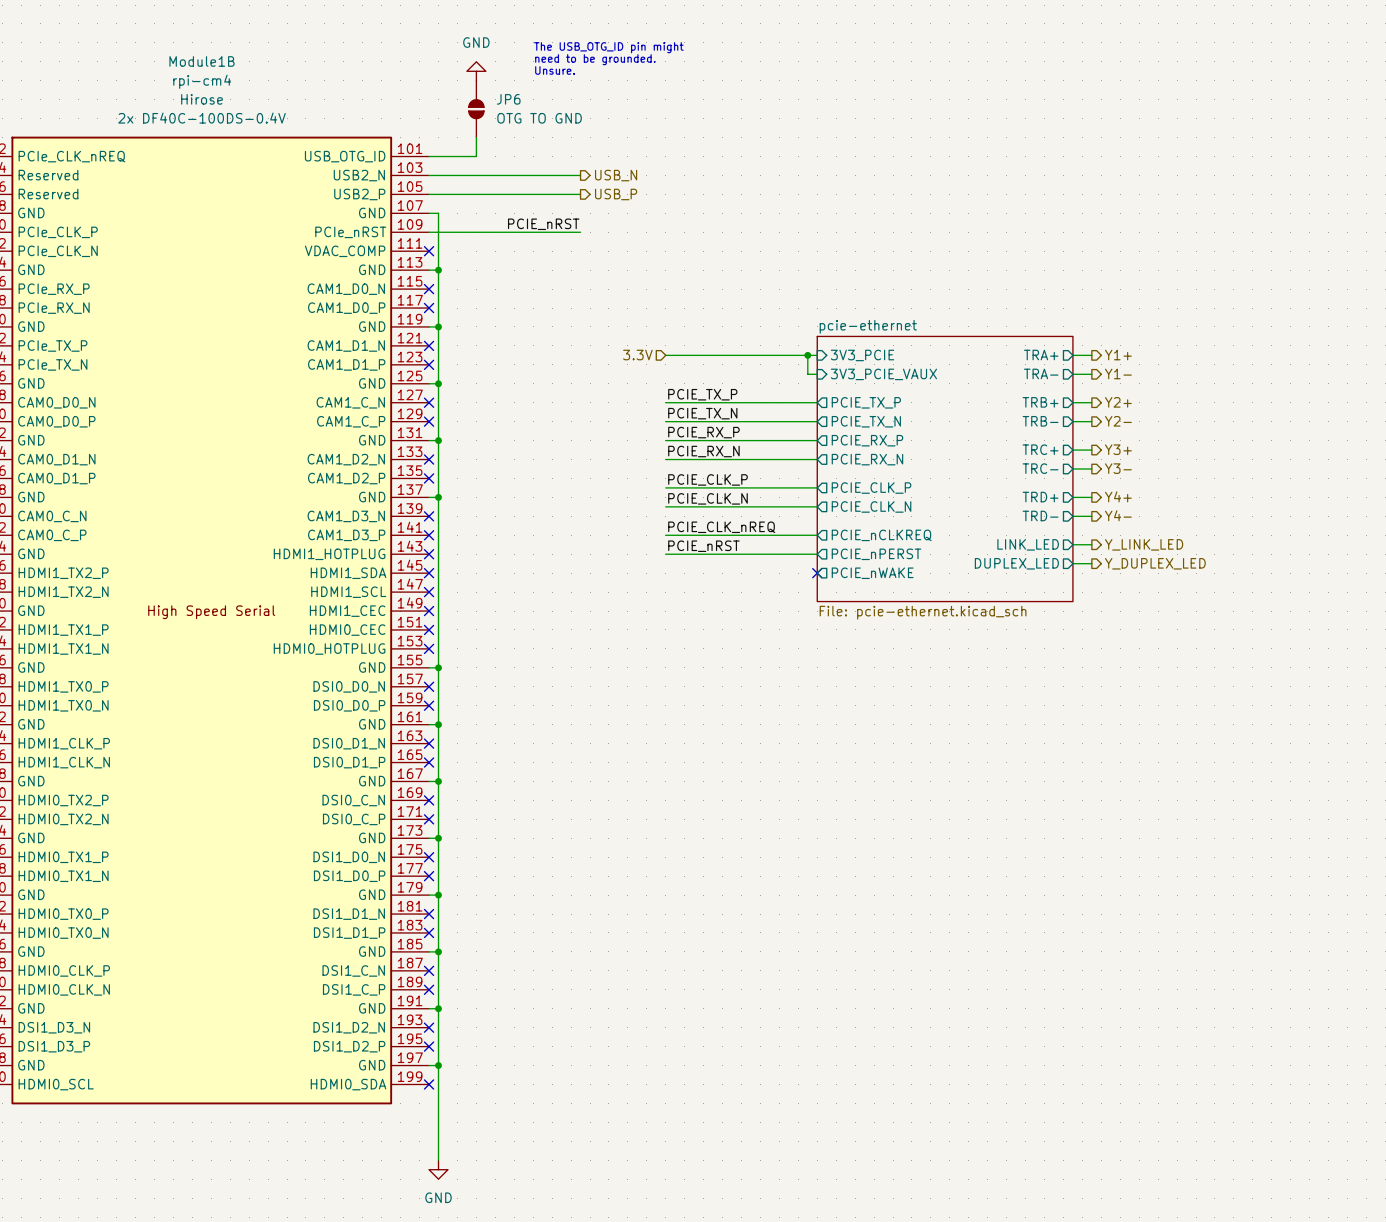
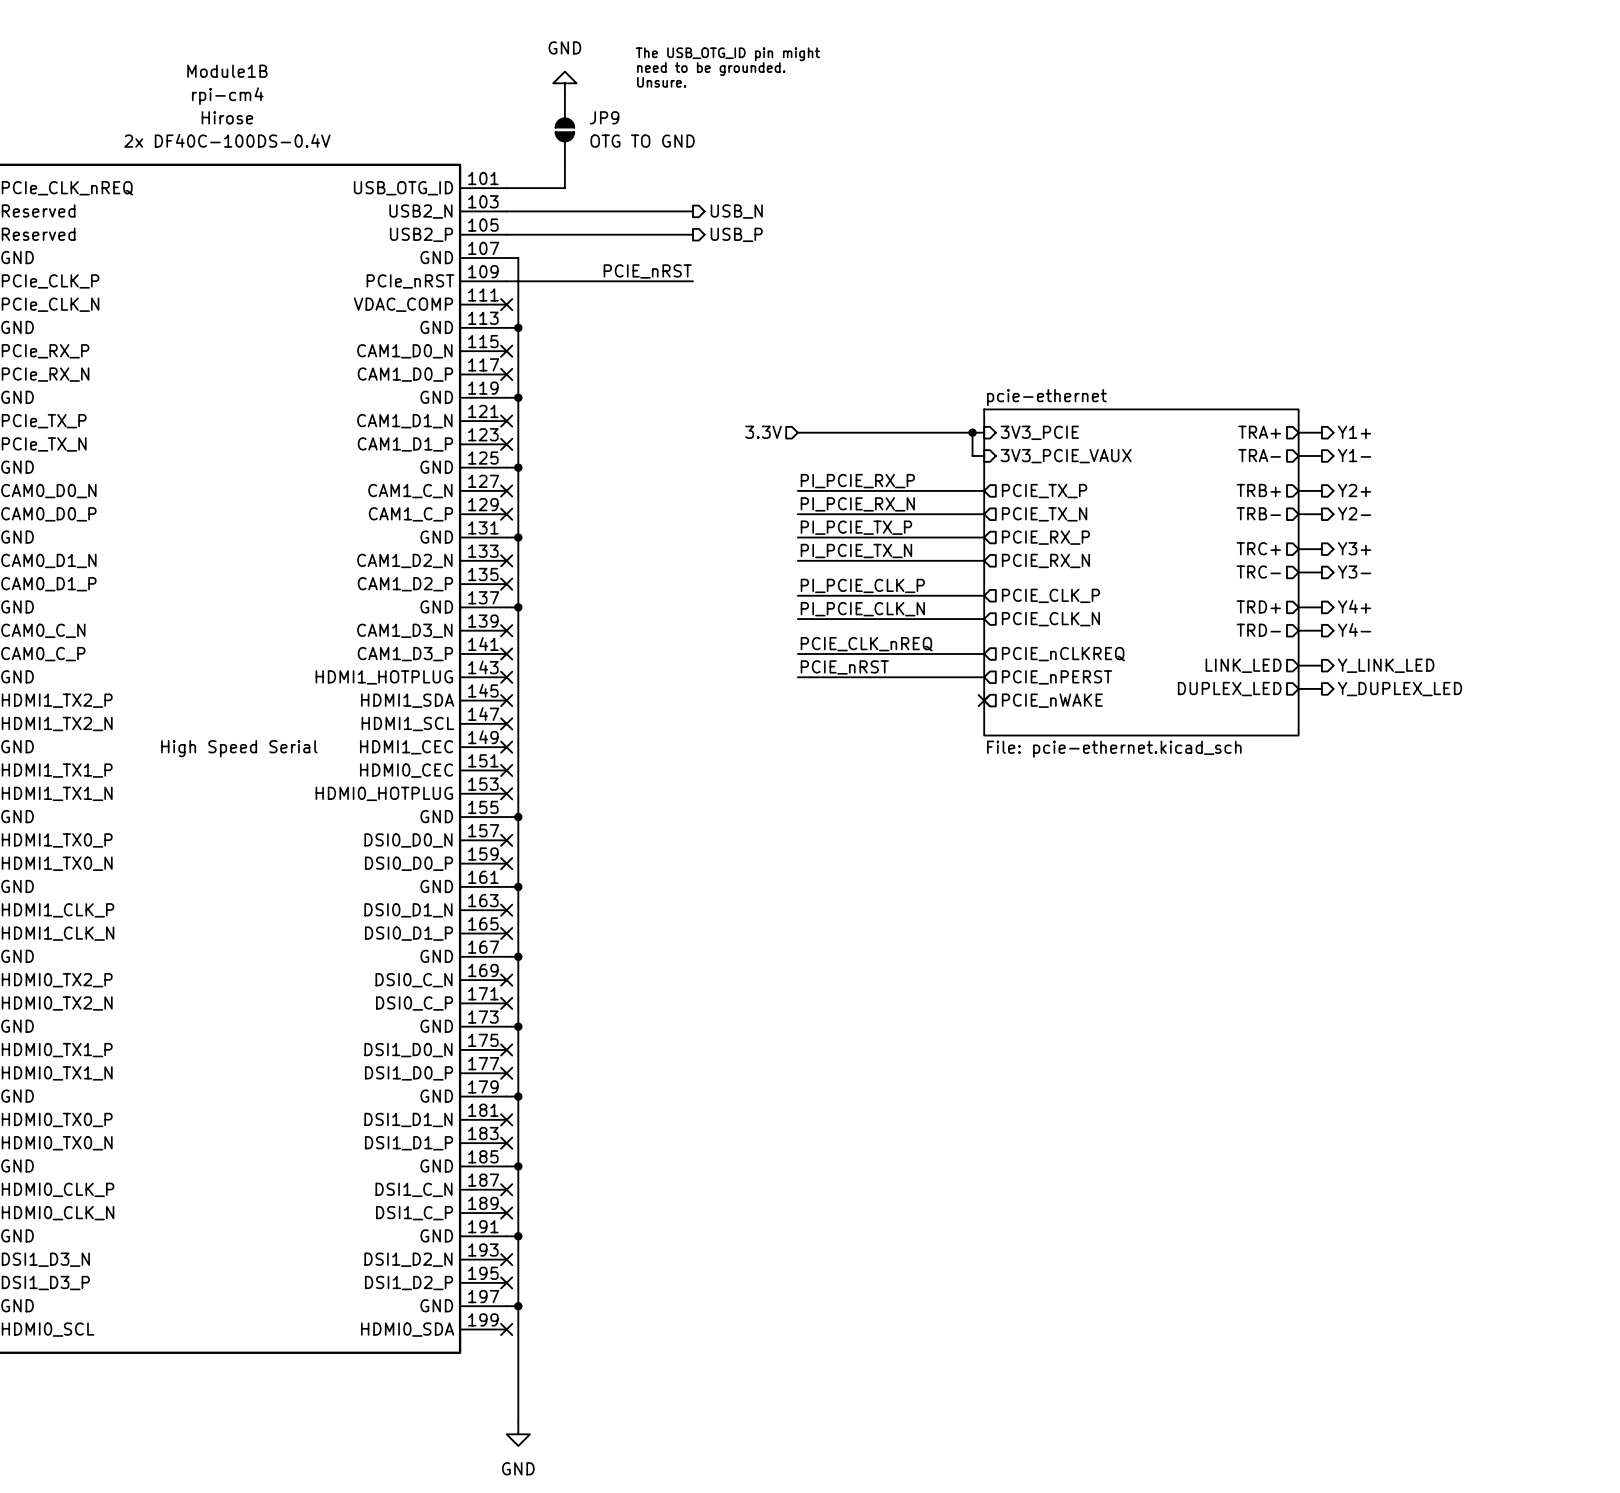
JP6 name: JP6 (508, 99) -> JP9 (604, 117)
label: PCIE_TX_P (702, 394) -> PI_PCIE_RX_P (857, 481)
label: PCIE_TX_N (702, 413) -> PI_PCIE_RX_N (857, 504)
label: PCIE_RX_P (703, 432) -> PI_PCIE_TX_P (856, 527)
label: PCIE_RX_N (703, 451) -> PI_PCIE_TX_N (856, 550)
label: PCIE_CLK_P (707, 479) -> PI_PCIE_CLK_P (862, 585)
label: PCIE_CLK_N (707, 498) -> PI_PCIE_CLK_N (862, 609)

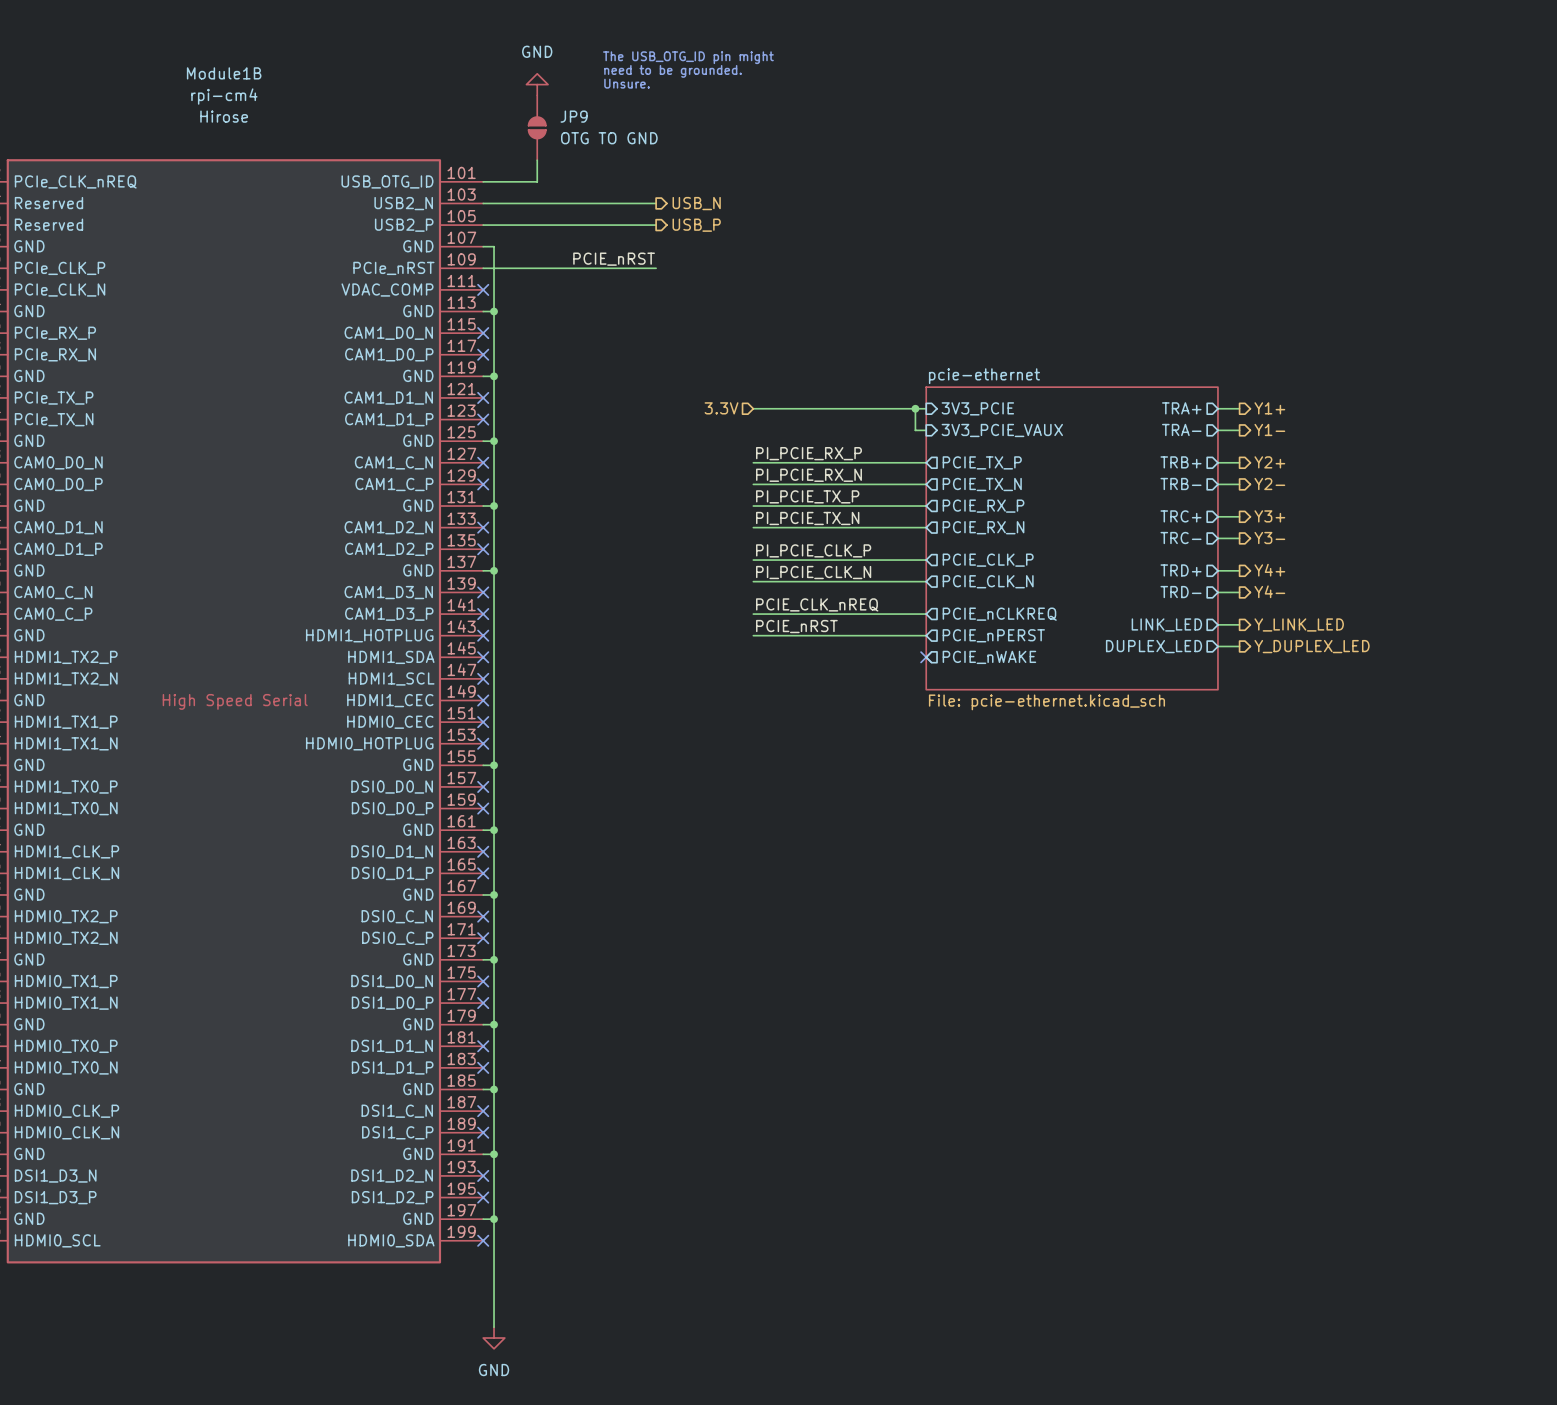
Module1B text: 2x DF40C-100DS-0.4V (227, 140) -> none

